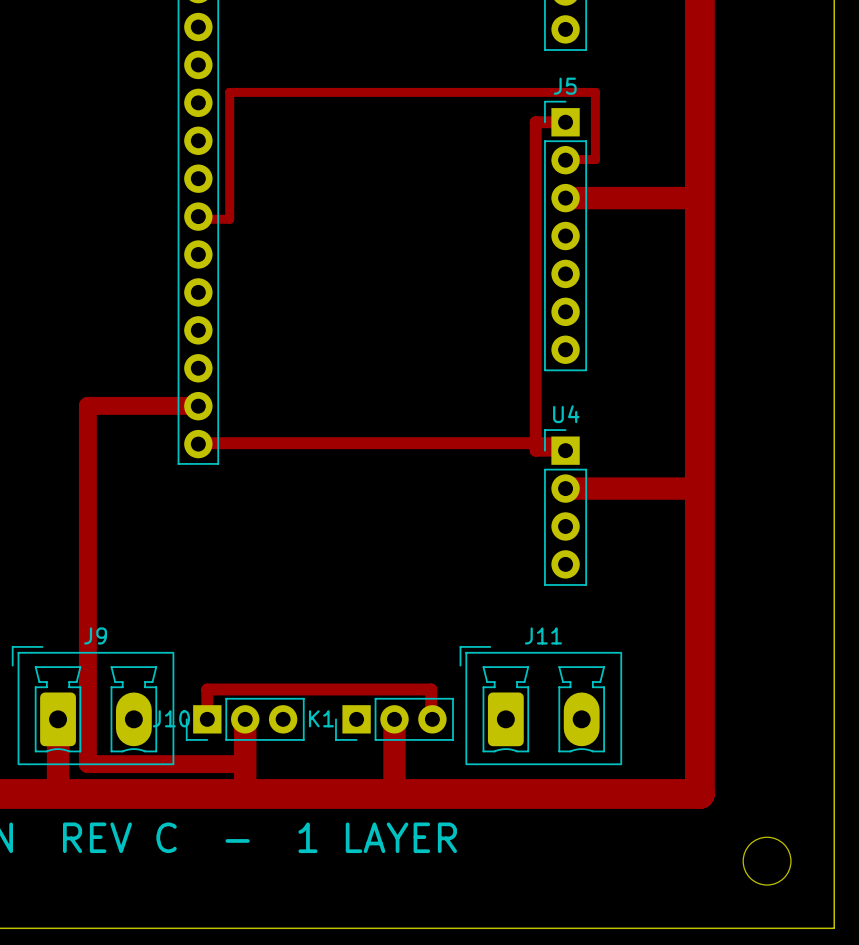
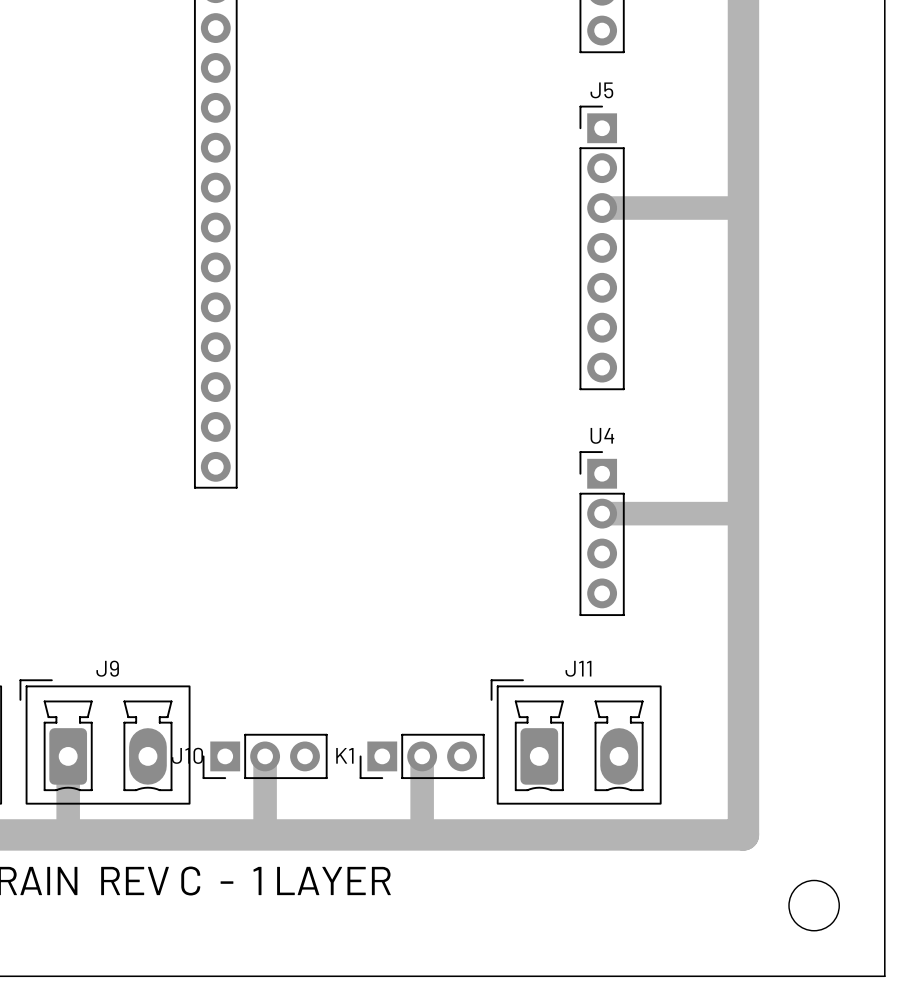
track: (565, 122) (535, 122) (535, 450) (565, 450) (565, 443) (207, 443) (198, 444) -> none
track: (565, 160) (595, 159) (595, 92) (229, 92) (229, 219) (207, 219) (198, 216) -> none
track: (198, 406) (87, 405) (87, 764) (244, 764) (245, 719) -> none
track: (207, 719) (207, 689) (431, 689) (432, 719) -> none

